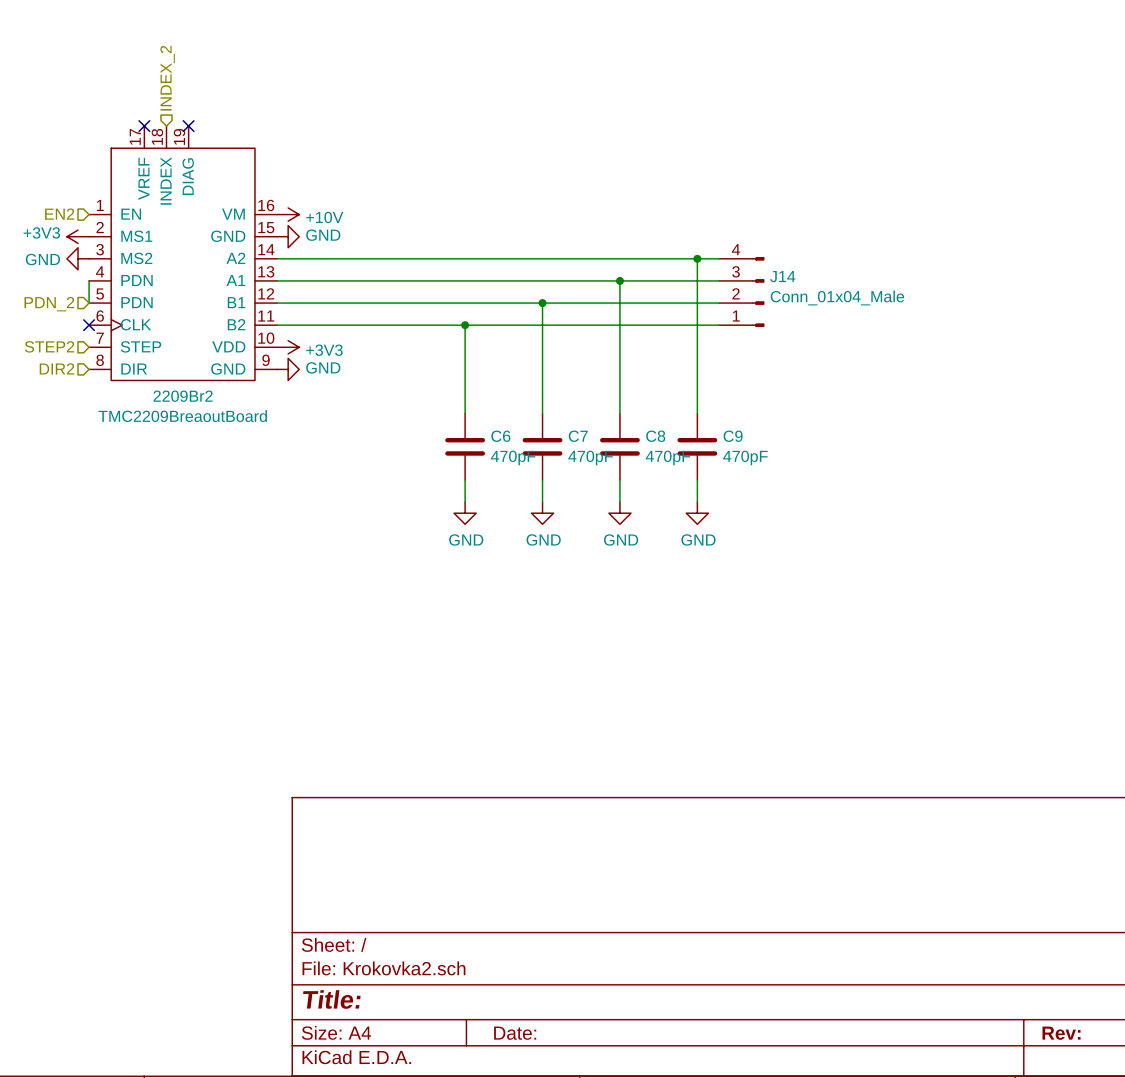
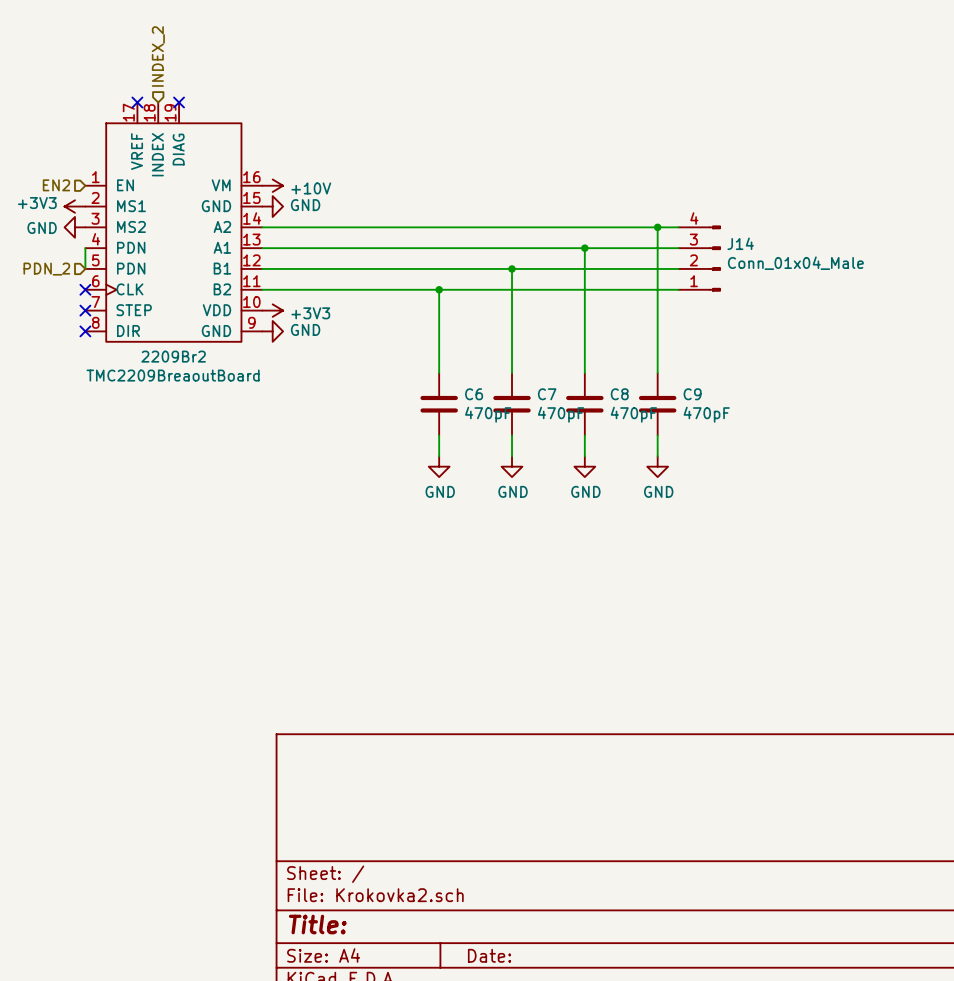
hierarchical label: STEP2 (49, 346) -> none
no-connect mark: none -> (85, 310)
hierarchical label: DIR2 (56, 368) -> none
no-connect mark: none -> (85, 331)

